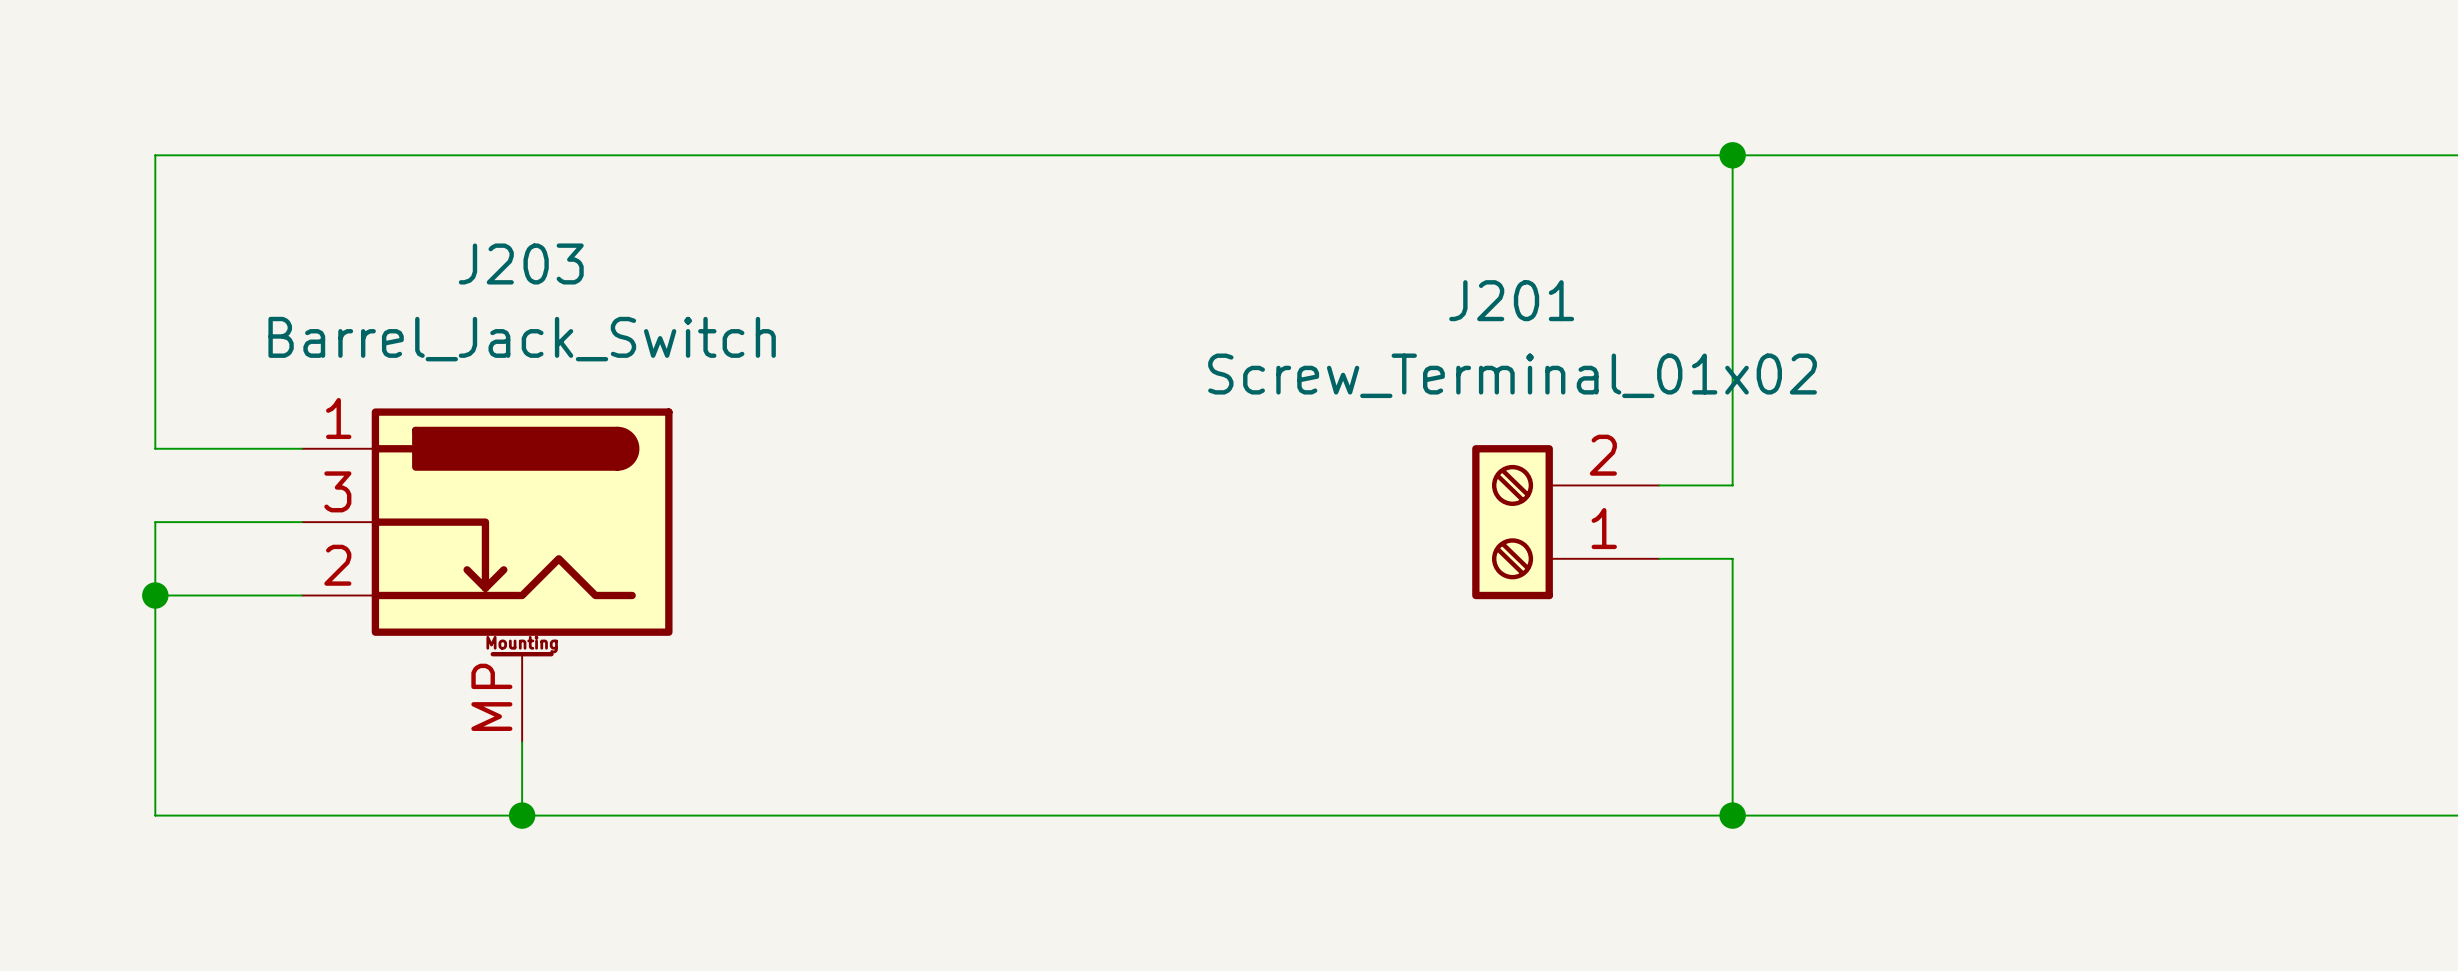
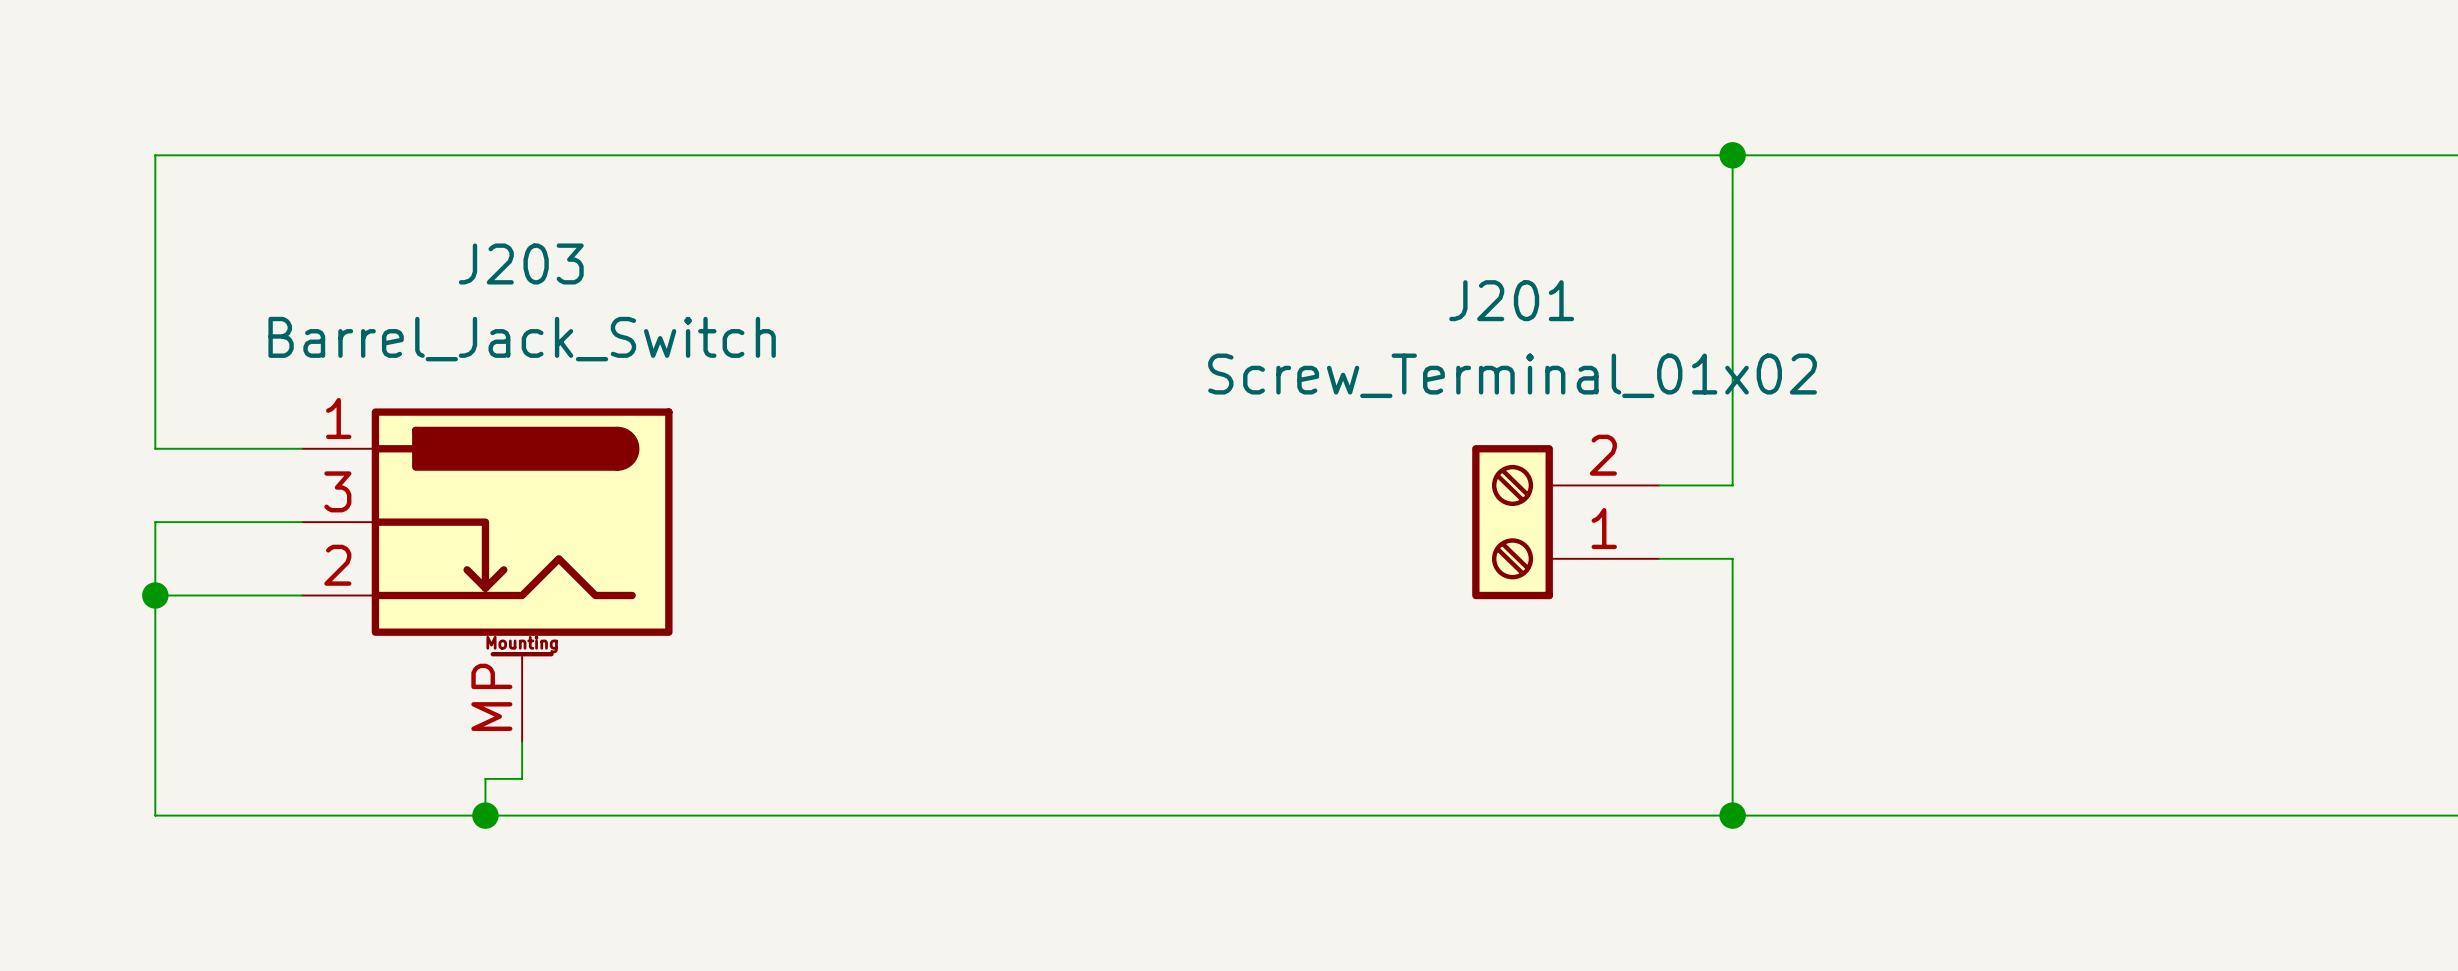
wire: (522, 778) (522, 815) -> (522, 778) (485, 778) (485, 815)
junction position: (522, 815) -> (485, 815)

